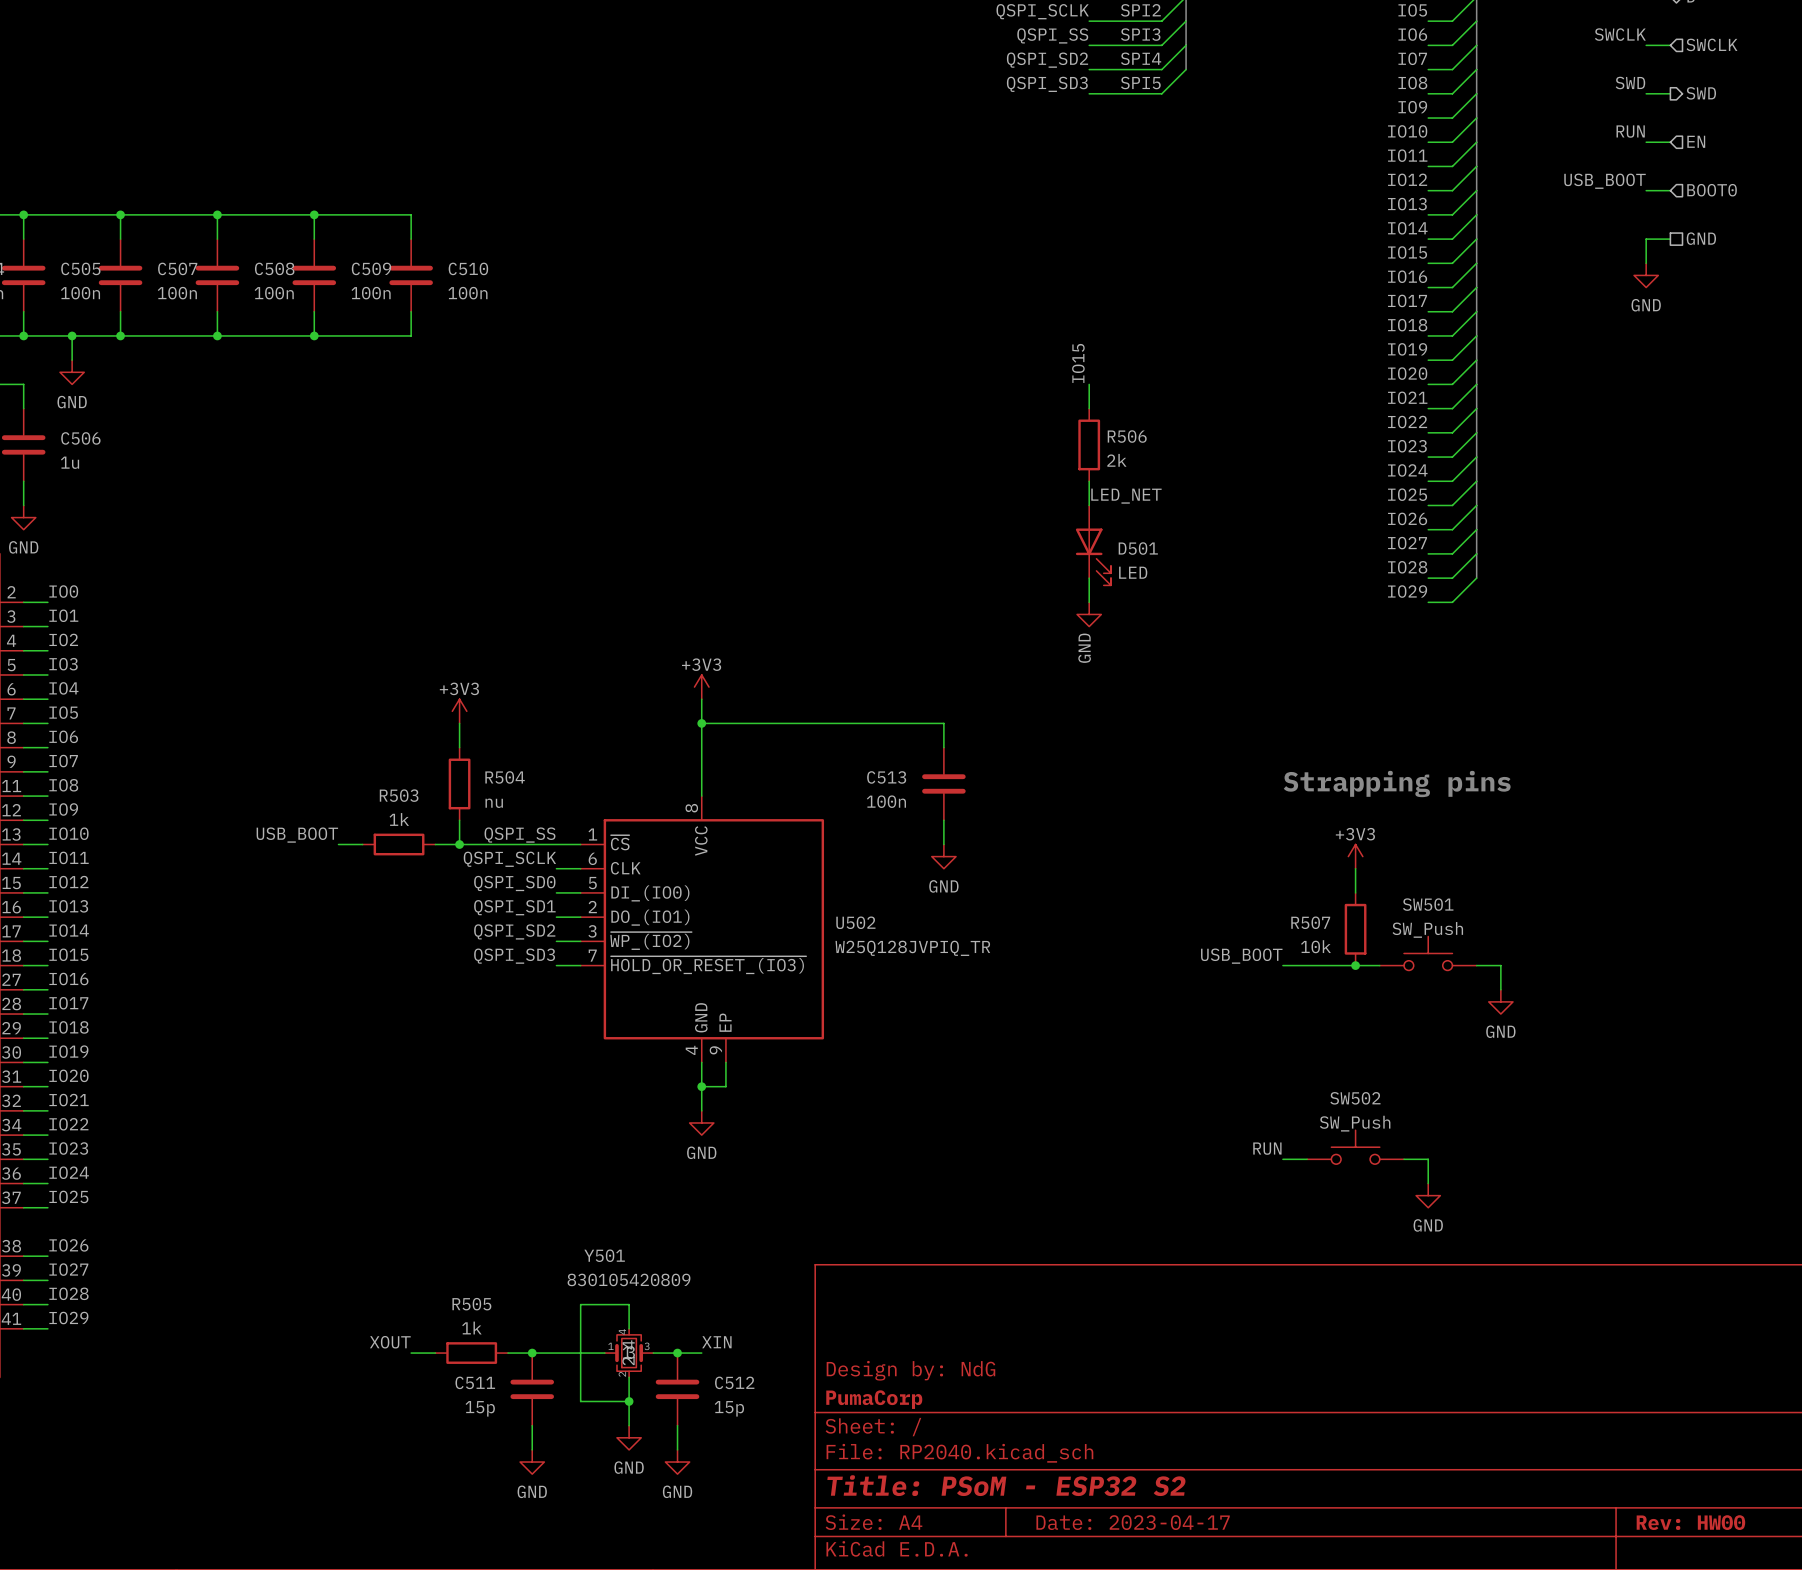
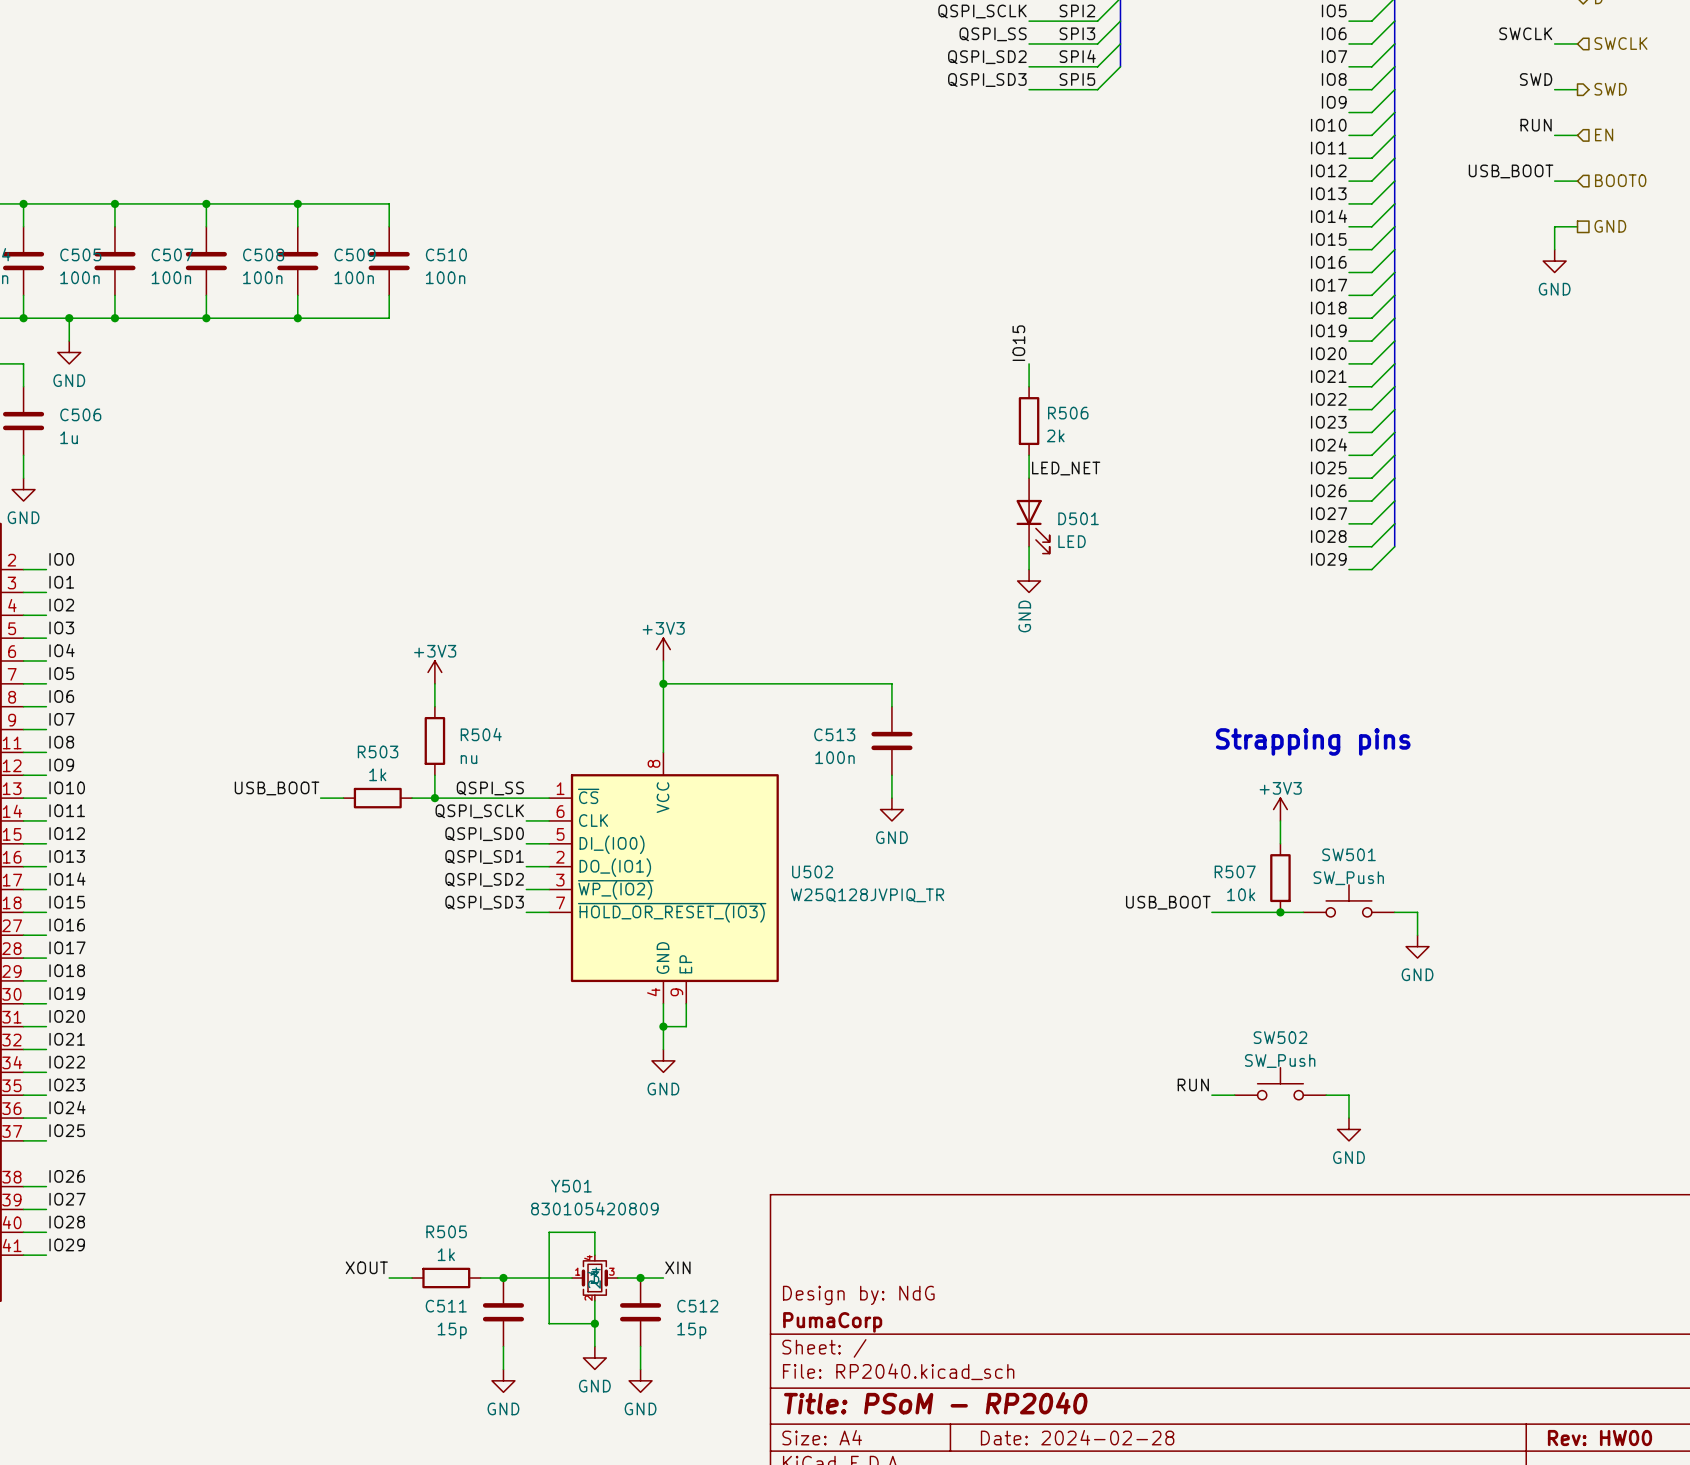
title block: Title: PSoM - ESP32 S2 (1006, 1485) -> Title: PSoM - RP2040 (935, 1403)
title block: Date: 2023-04-17 (1133, 1522) -> Date: 2024-02-28 (1077, 1437)

